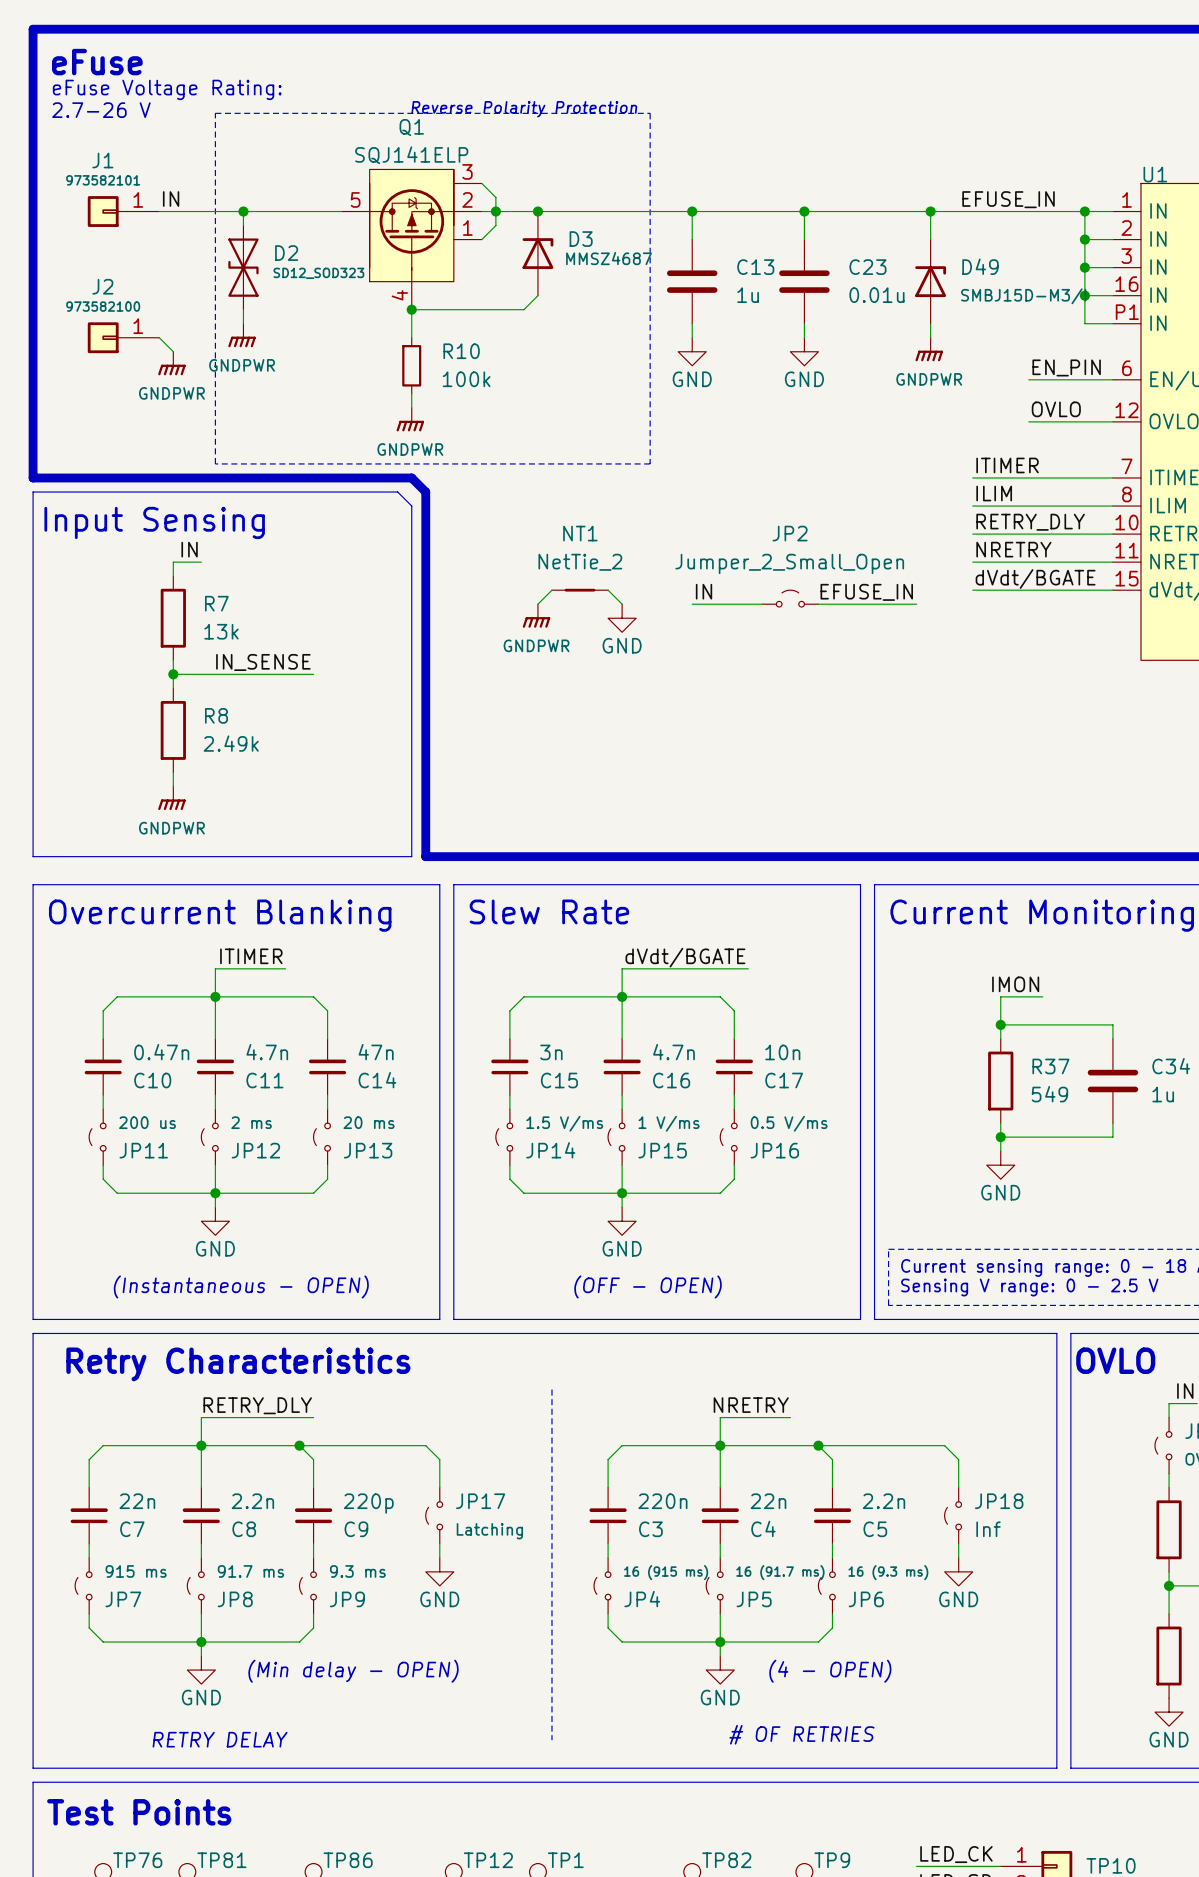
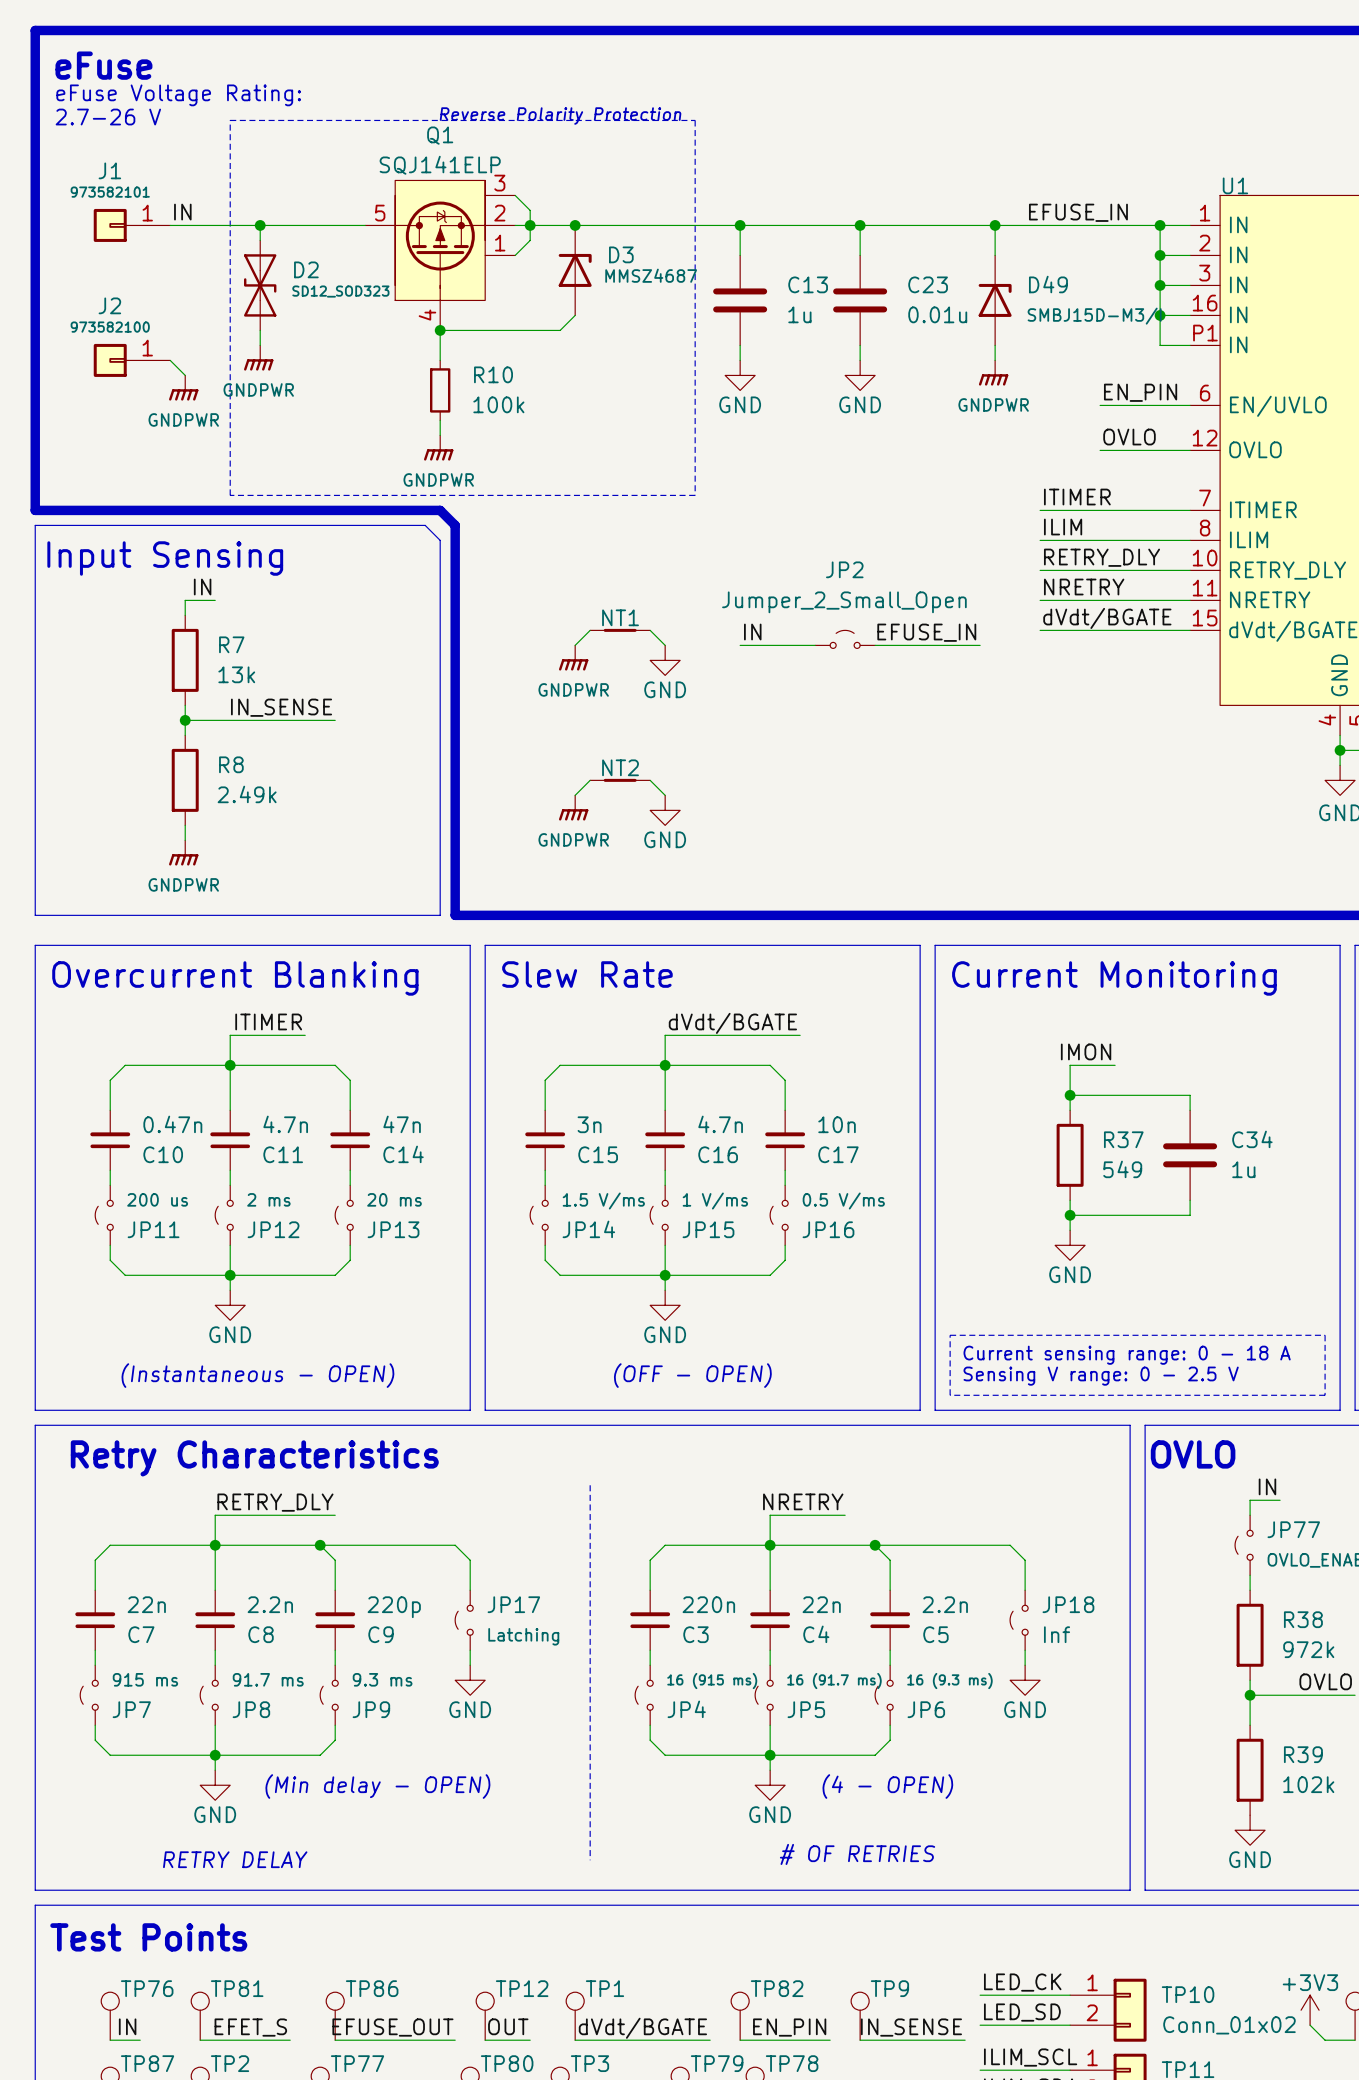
NT1 name position: NT1 (580, 533) -> NT1 (620, 617)
NT1 value: NetTie_2 (580, 562) -> none
wire: none -> (590, 780) (575, 795)
NT2: none -> (620, 780)
wire: none -> (650, 780) (665, 795)
power symbol: none -> GNDPWR (573, 807)
power symbol: none -> GND (665, 810)

